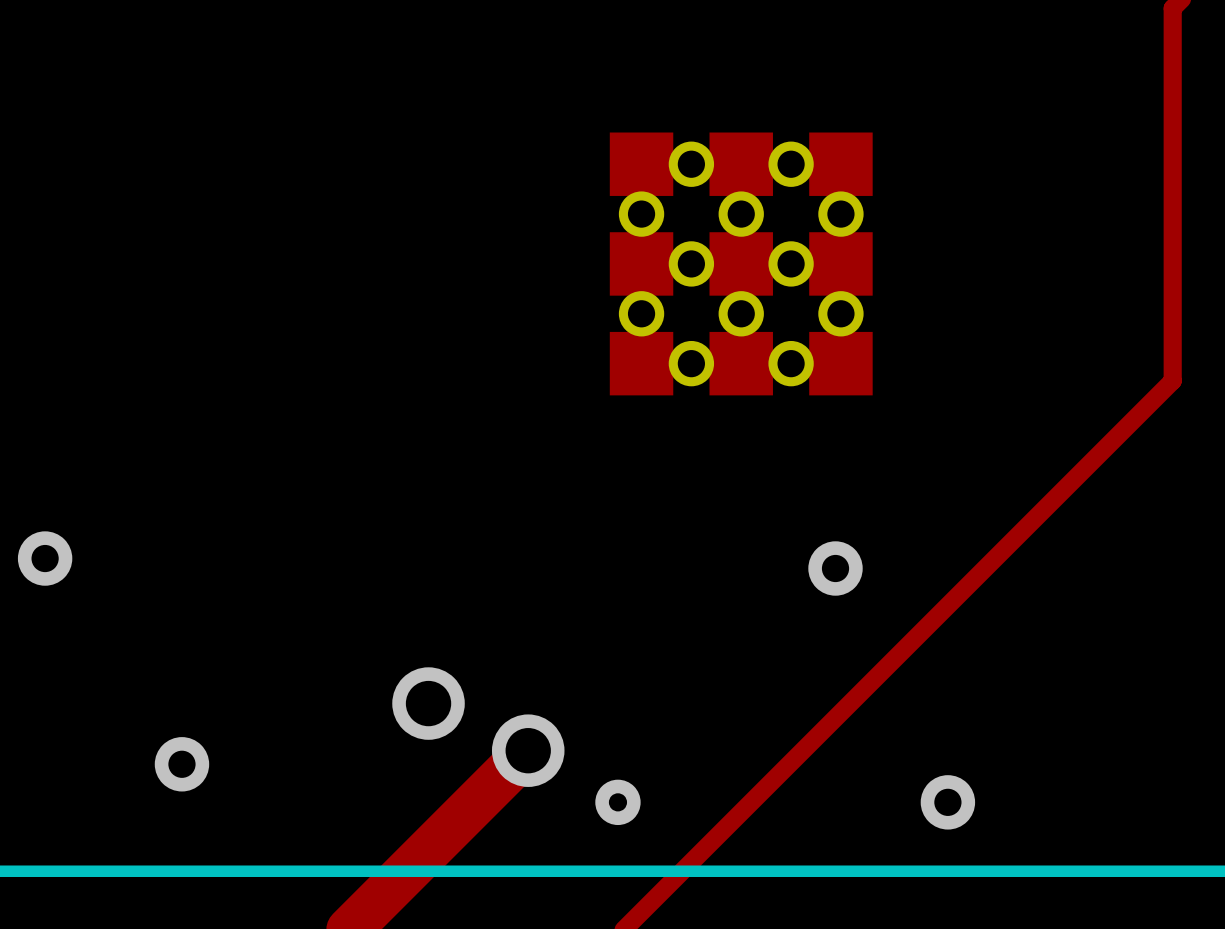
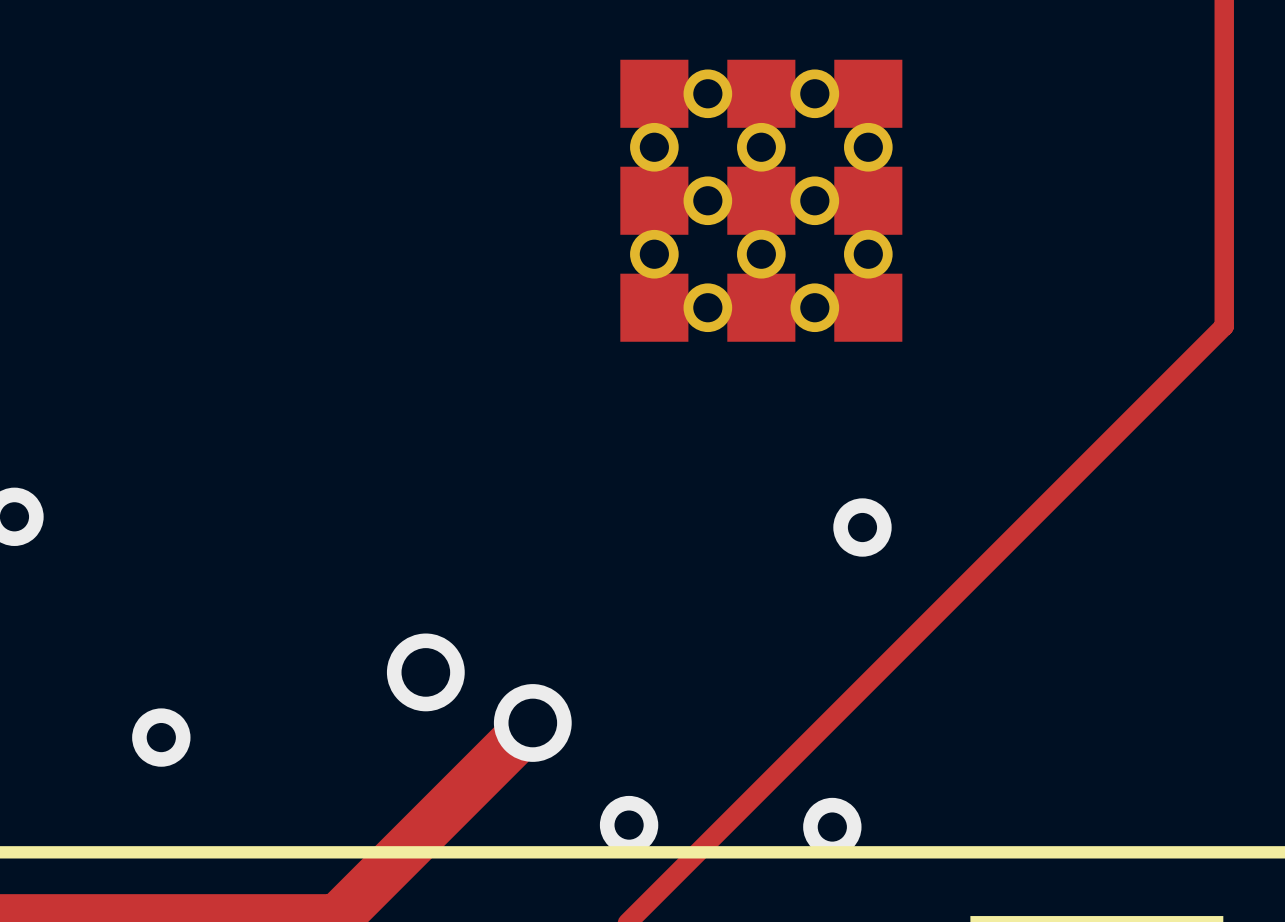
via position: (617, 802) -> (629, 825)
via: (947, 802) -> none
via: none -> (832, 827)

